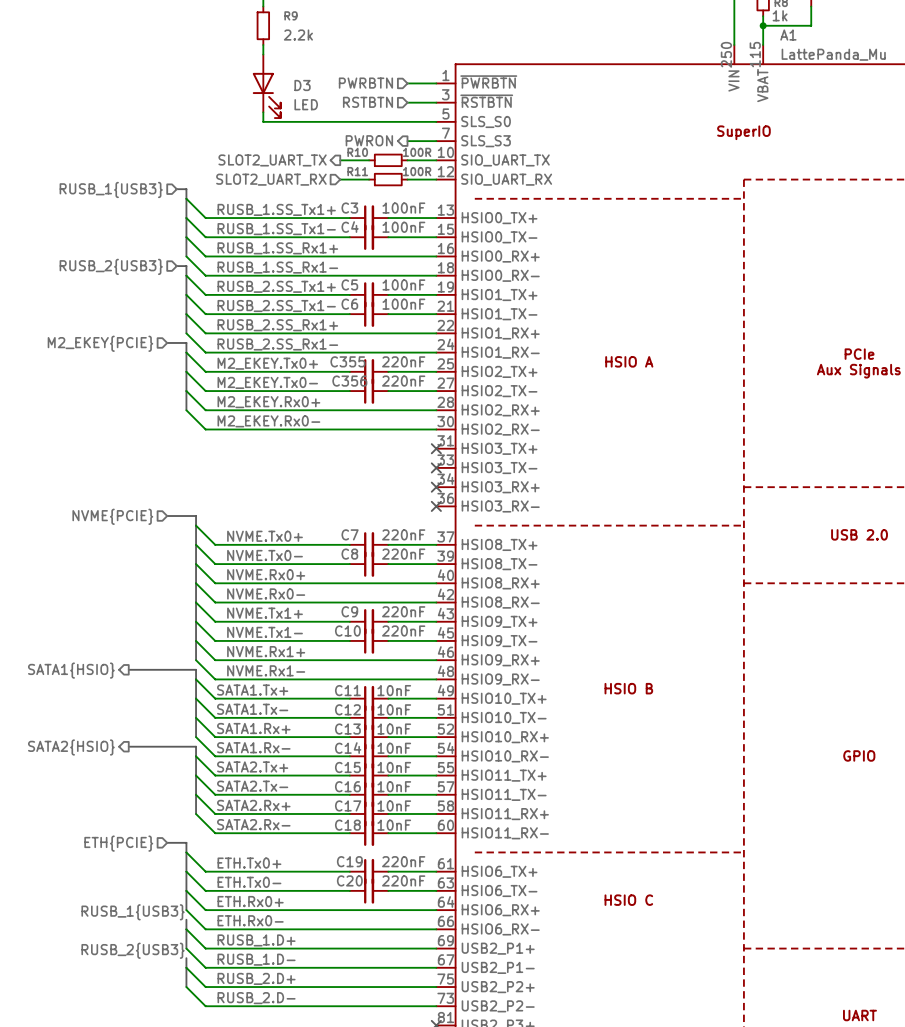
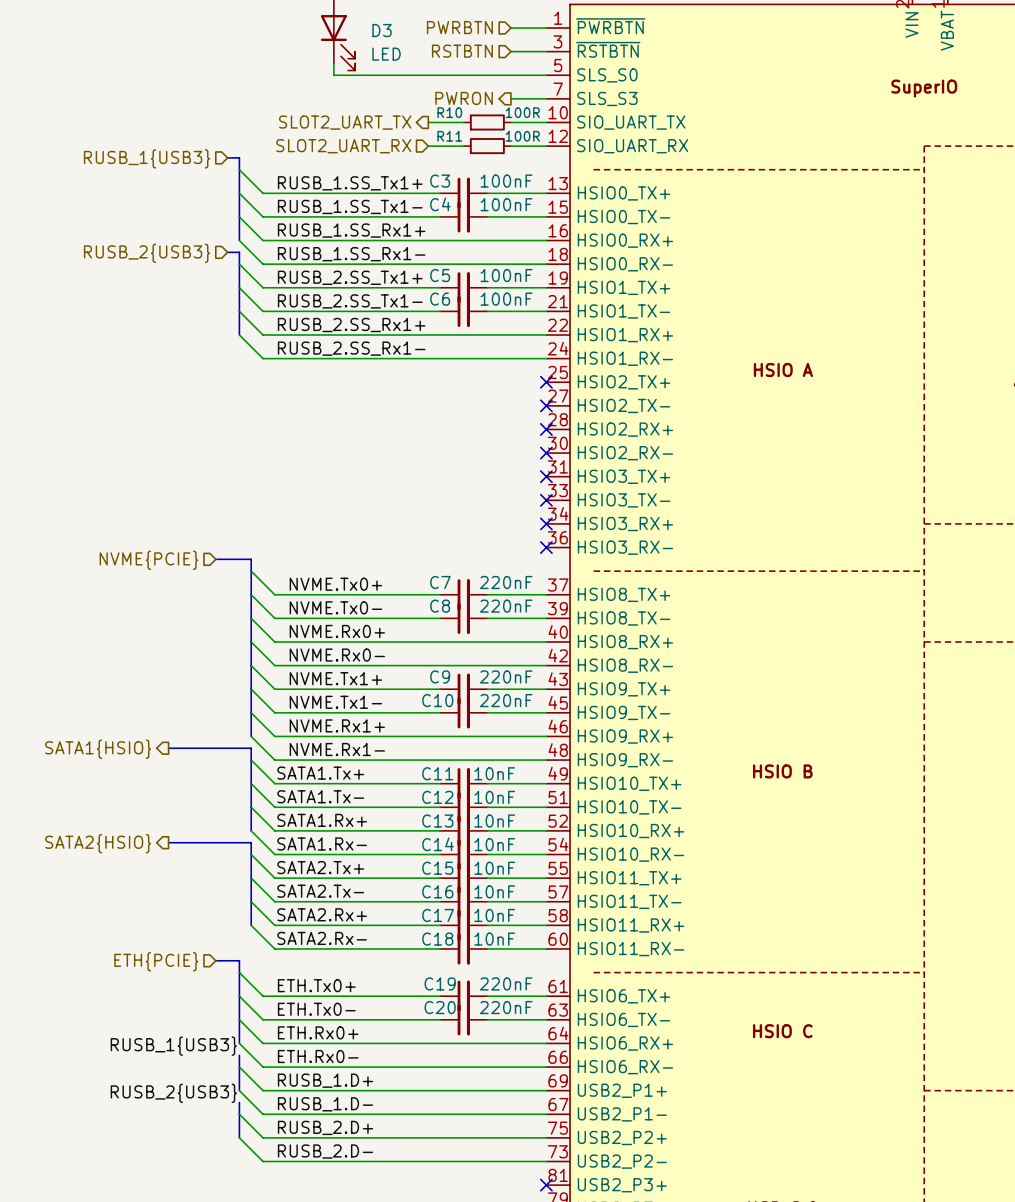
bus: (167, 342) (186, 342) (186, 410) -> none
hierarchical label: M2_EKEY{PCIE} (100, 343) -> none
wire: (186, 352) (205, 371) (349, 371) -> none
label: M2_EKEY.Tx0+ (267, 363) -> none
wire: (186, 371) (205, 391) (349, 391) -> none
C355: 220nF (369, 371) -> none
wire: (388, 371) (436, 371) -> none
no-connect mark: none -> (546, 382)
label: M2_EKEY.Tx0- (267, 382) -> none
wire: (186, 391) (205, 410) (436, 410) -> none
C356: 220nF (369, 391) -> none
wire: (388, 391) (436, 391) -> none
no-connect mark: none -> (546, 405)
label: M2_EKEY.Rx0+ (268, 402) -> none
wire: (186, 410) (205, 429) (436, 429) -> none
no-connect mark: none -> (546, 429)
label: M2_EKEY.Rx0- (268, 421) -> none
no-connect mark: none -> (546, 453)

